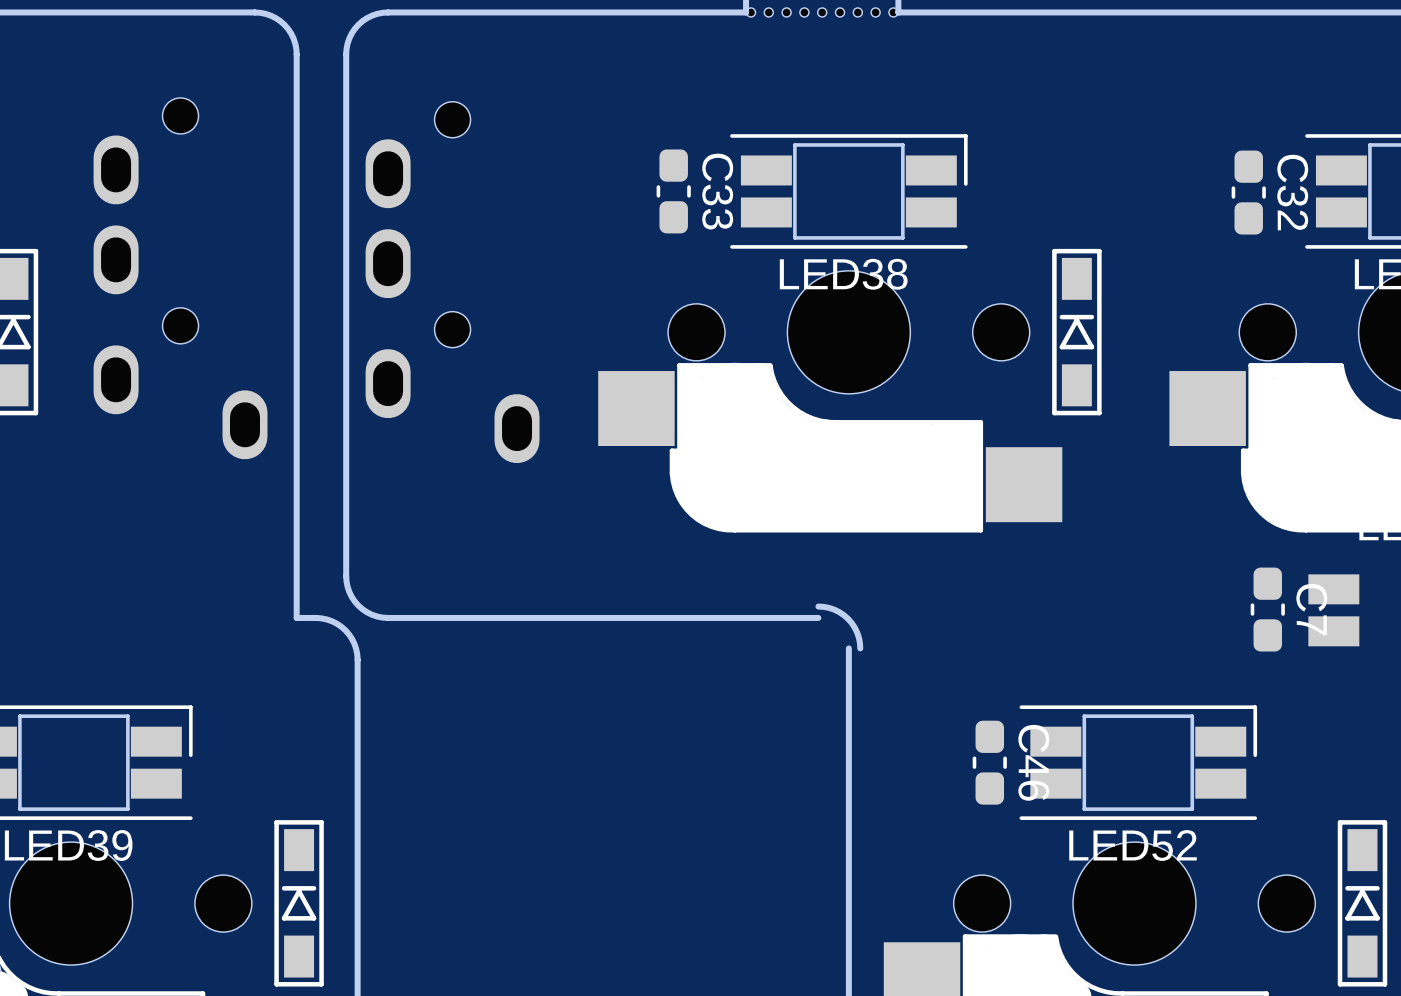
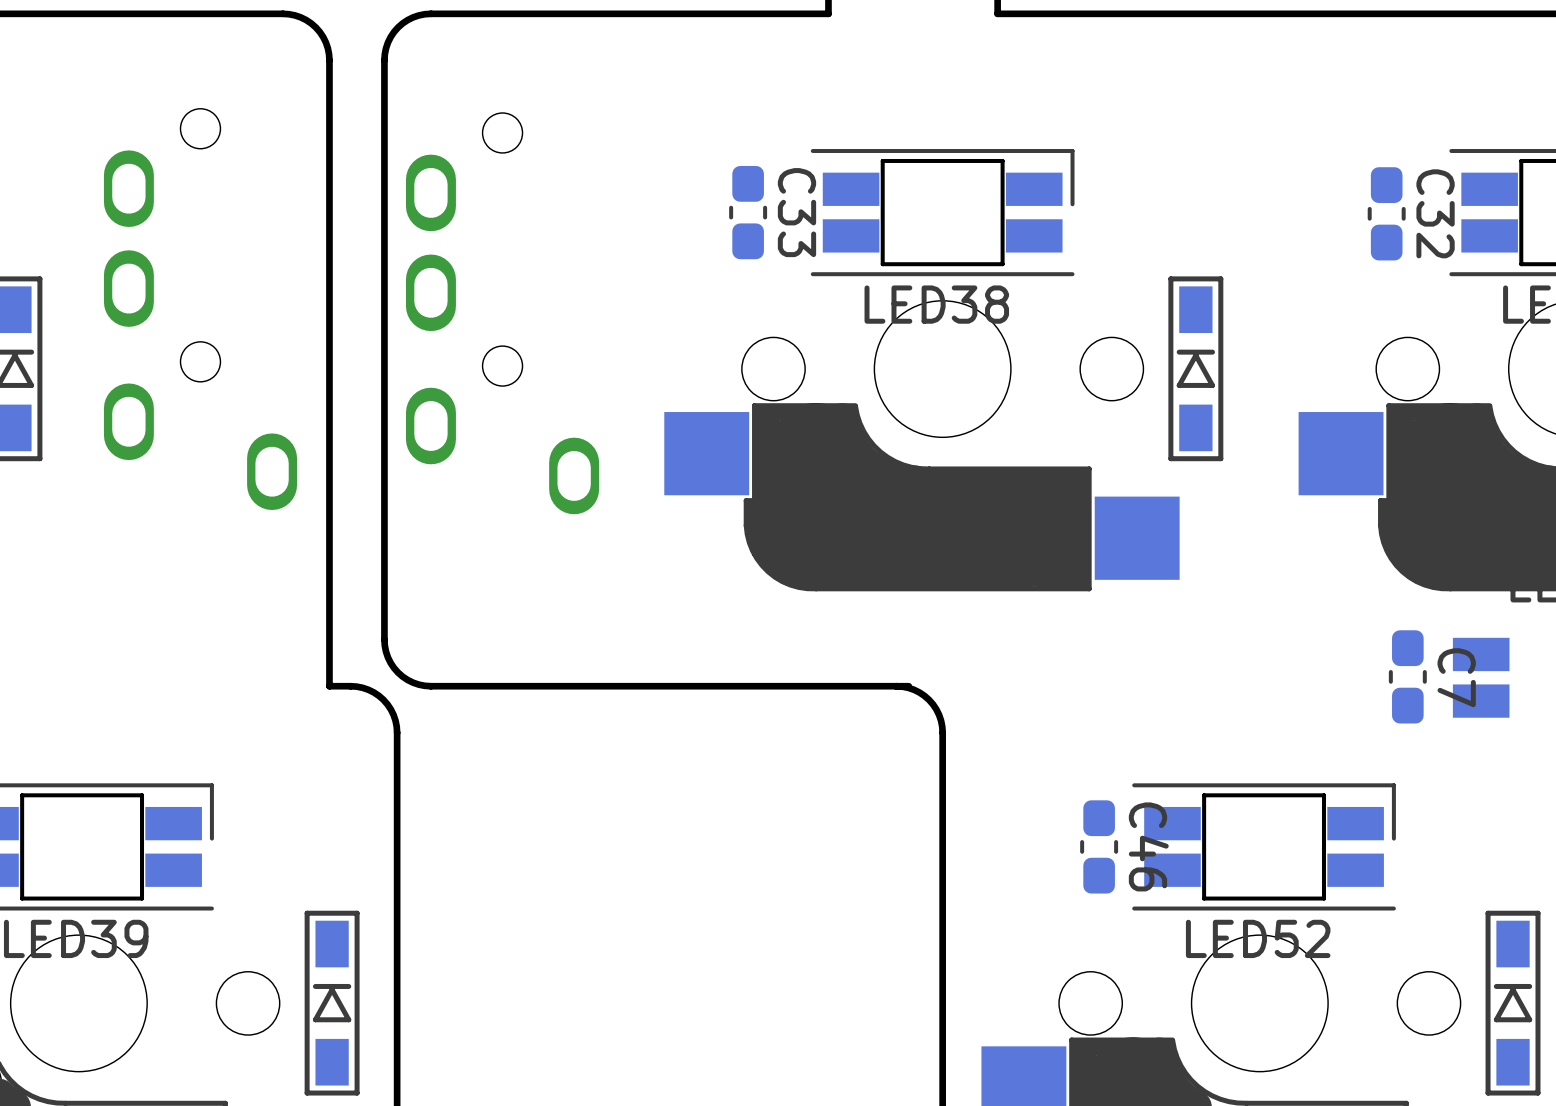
part: (822, 12) -> none
board edge: (818, 606) (834, 609) (848, 618) (857, 632) (860, 648) -> none
board edge: (848, 648) (848, 659) -> (896, 686) (913, 689) (929, 699) (939, 714) (942, 732)

